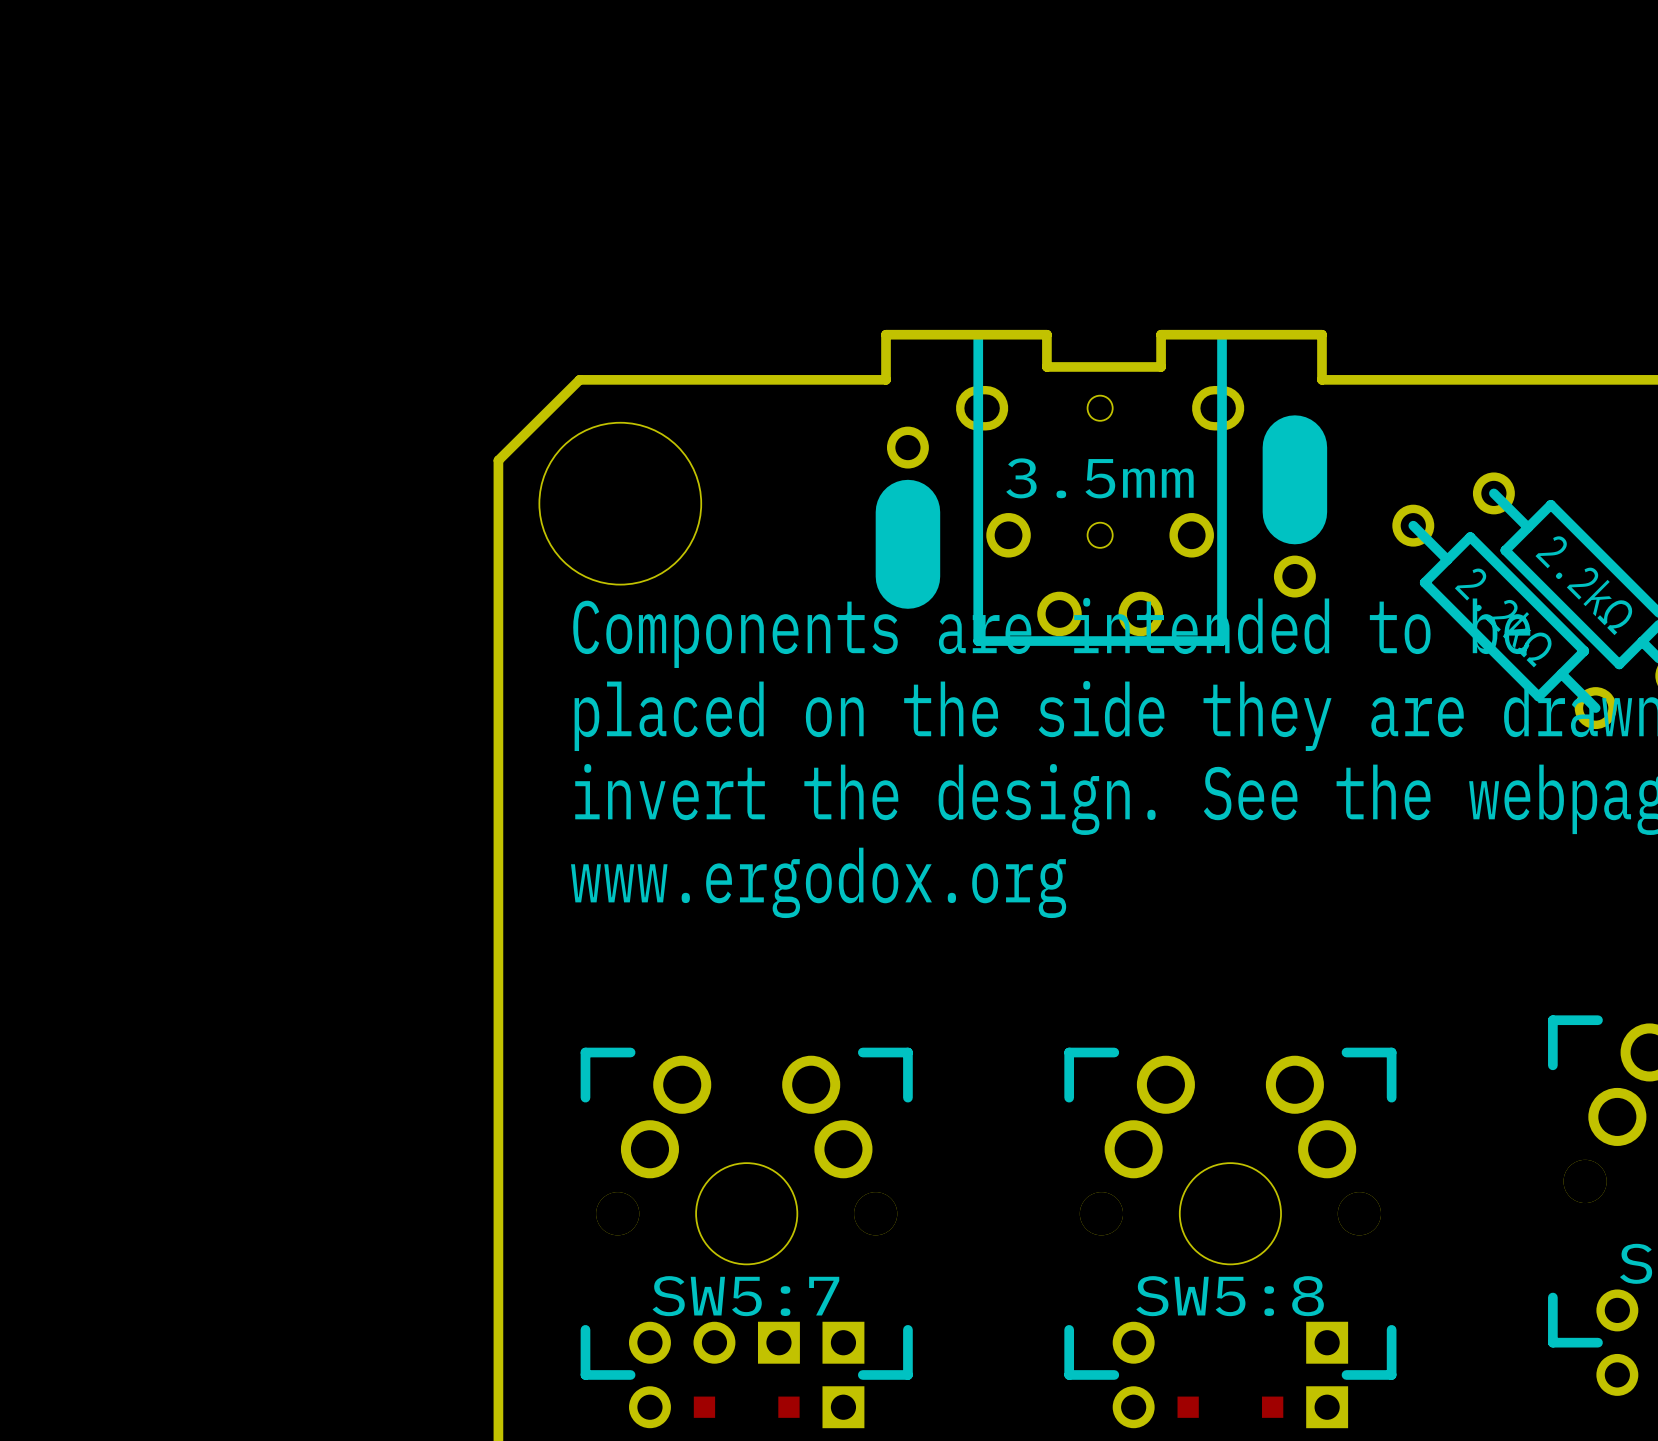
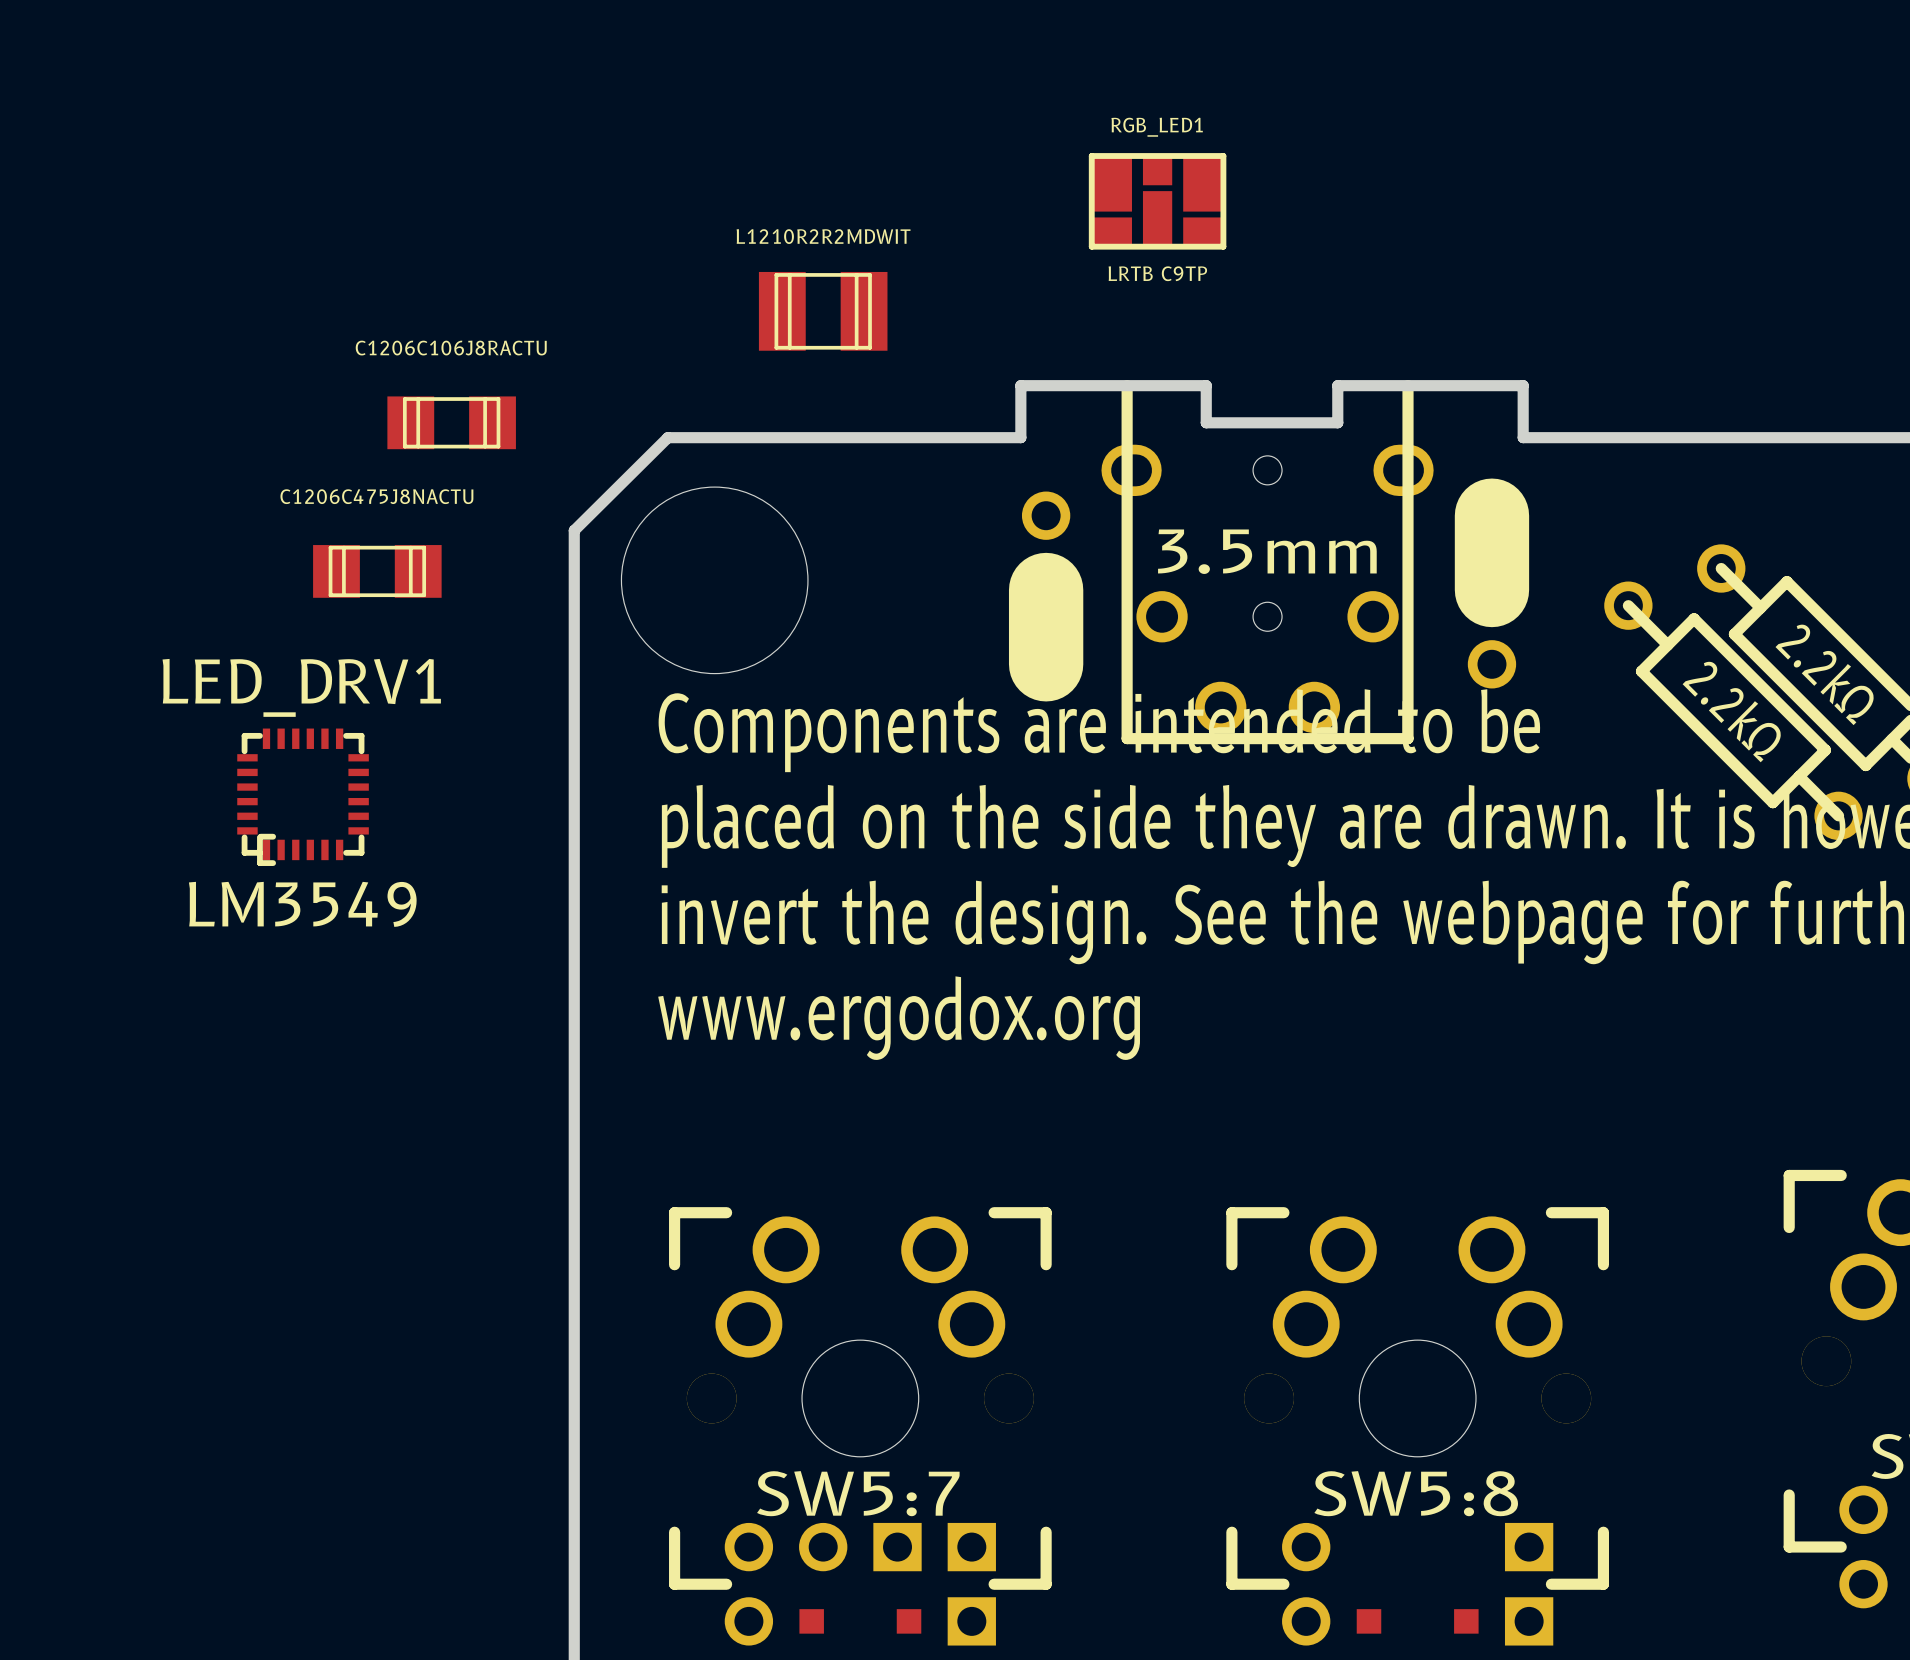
LRTB C9TP: none -> RGB_LED1 (1157, 201)
L1210R2R2MDWIT: none -> (823, 311)
C1206C106J8RACTU: none -> (451, 422)
C1206C475J8NACTU: none -> (377, 571)
LM3549: none -> LED_DRV1 (303, 797)

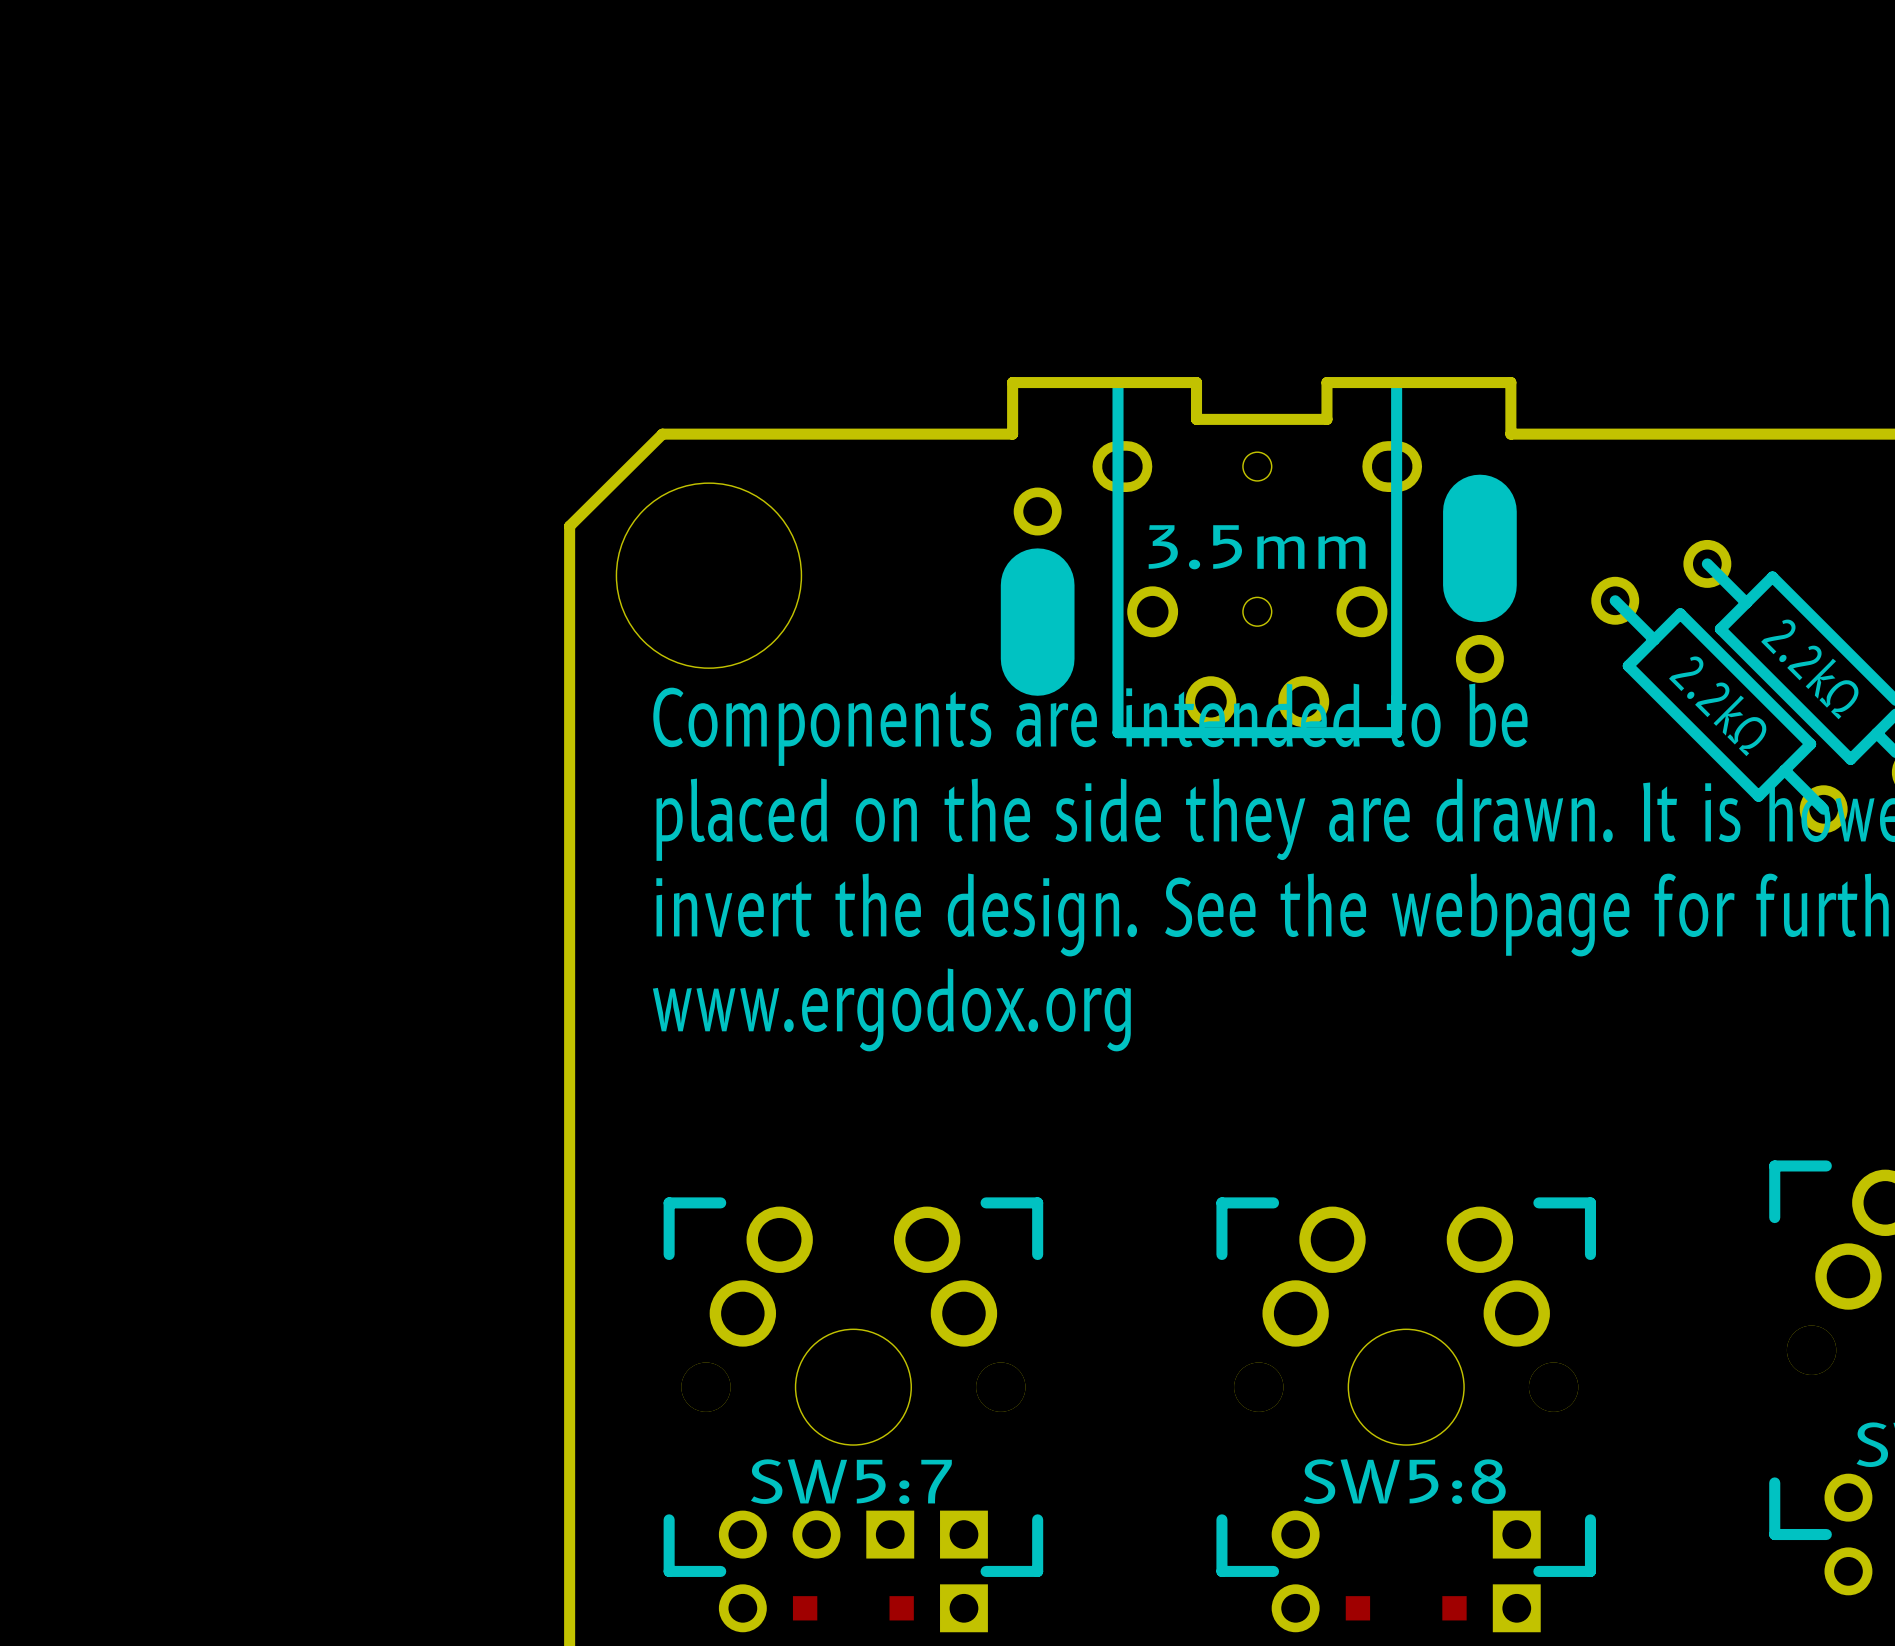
LRTB C9TP: RGB_LED1 (1157, 201) -> none
L1210R2R2MDWIT: (823, 311) -> none
C1206C106J8RACTU: (451, 422) -> none
C1206C475J8NACTU: (377, 571) -> none
LM3549: LED_DRV1 (303, 797) -> none

